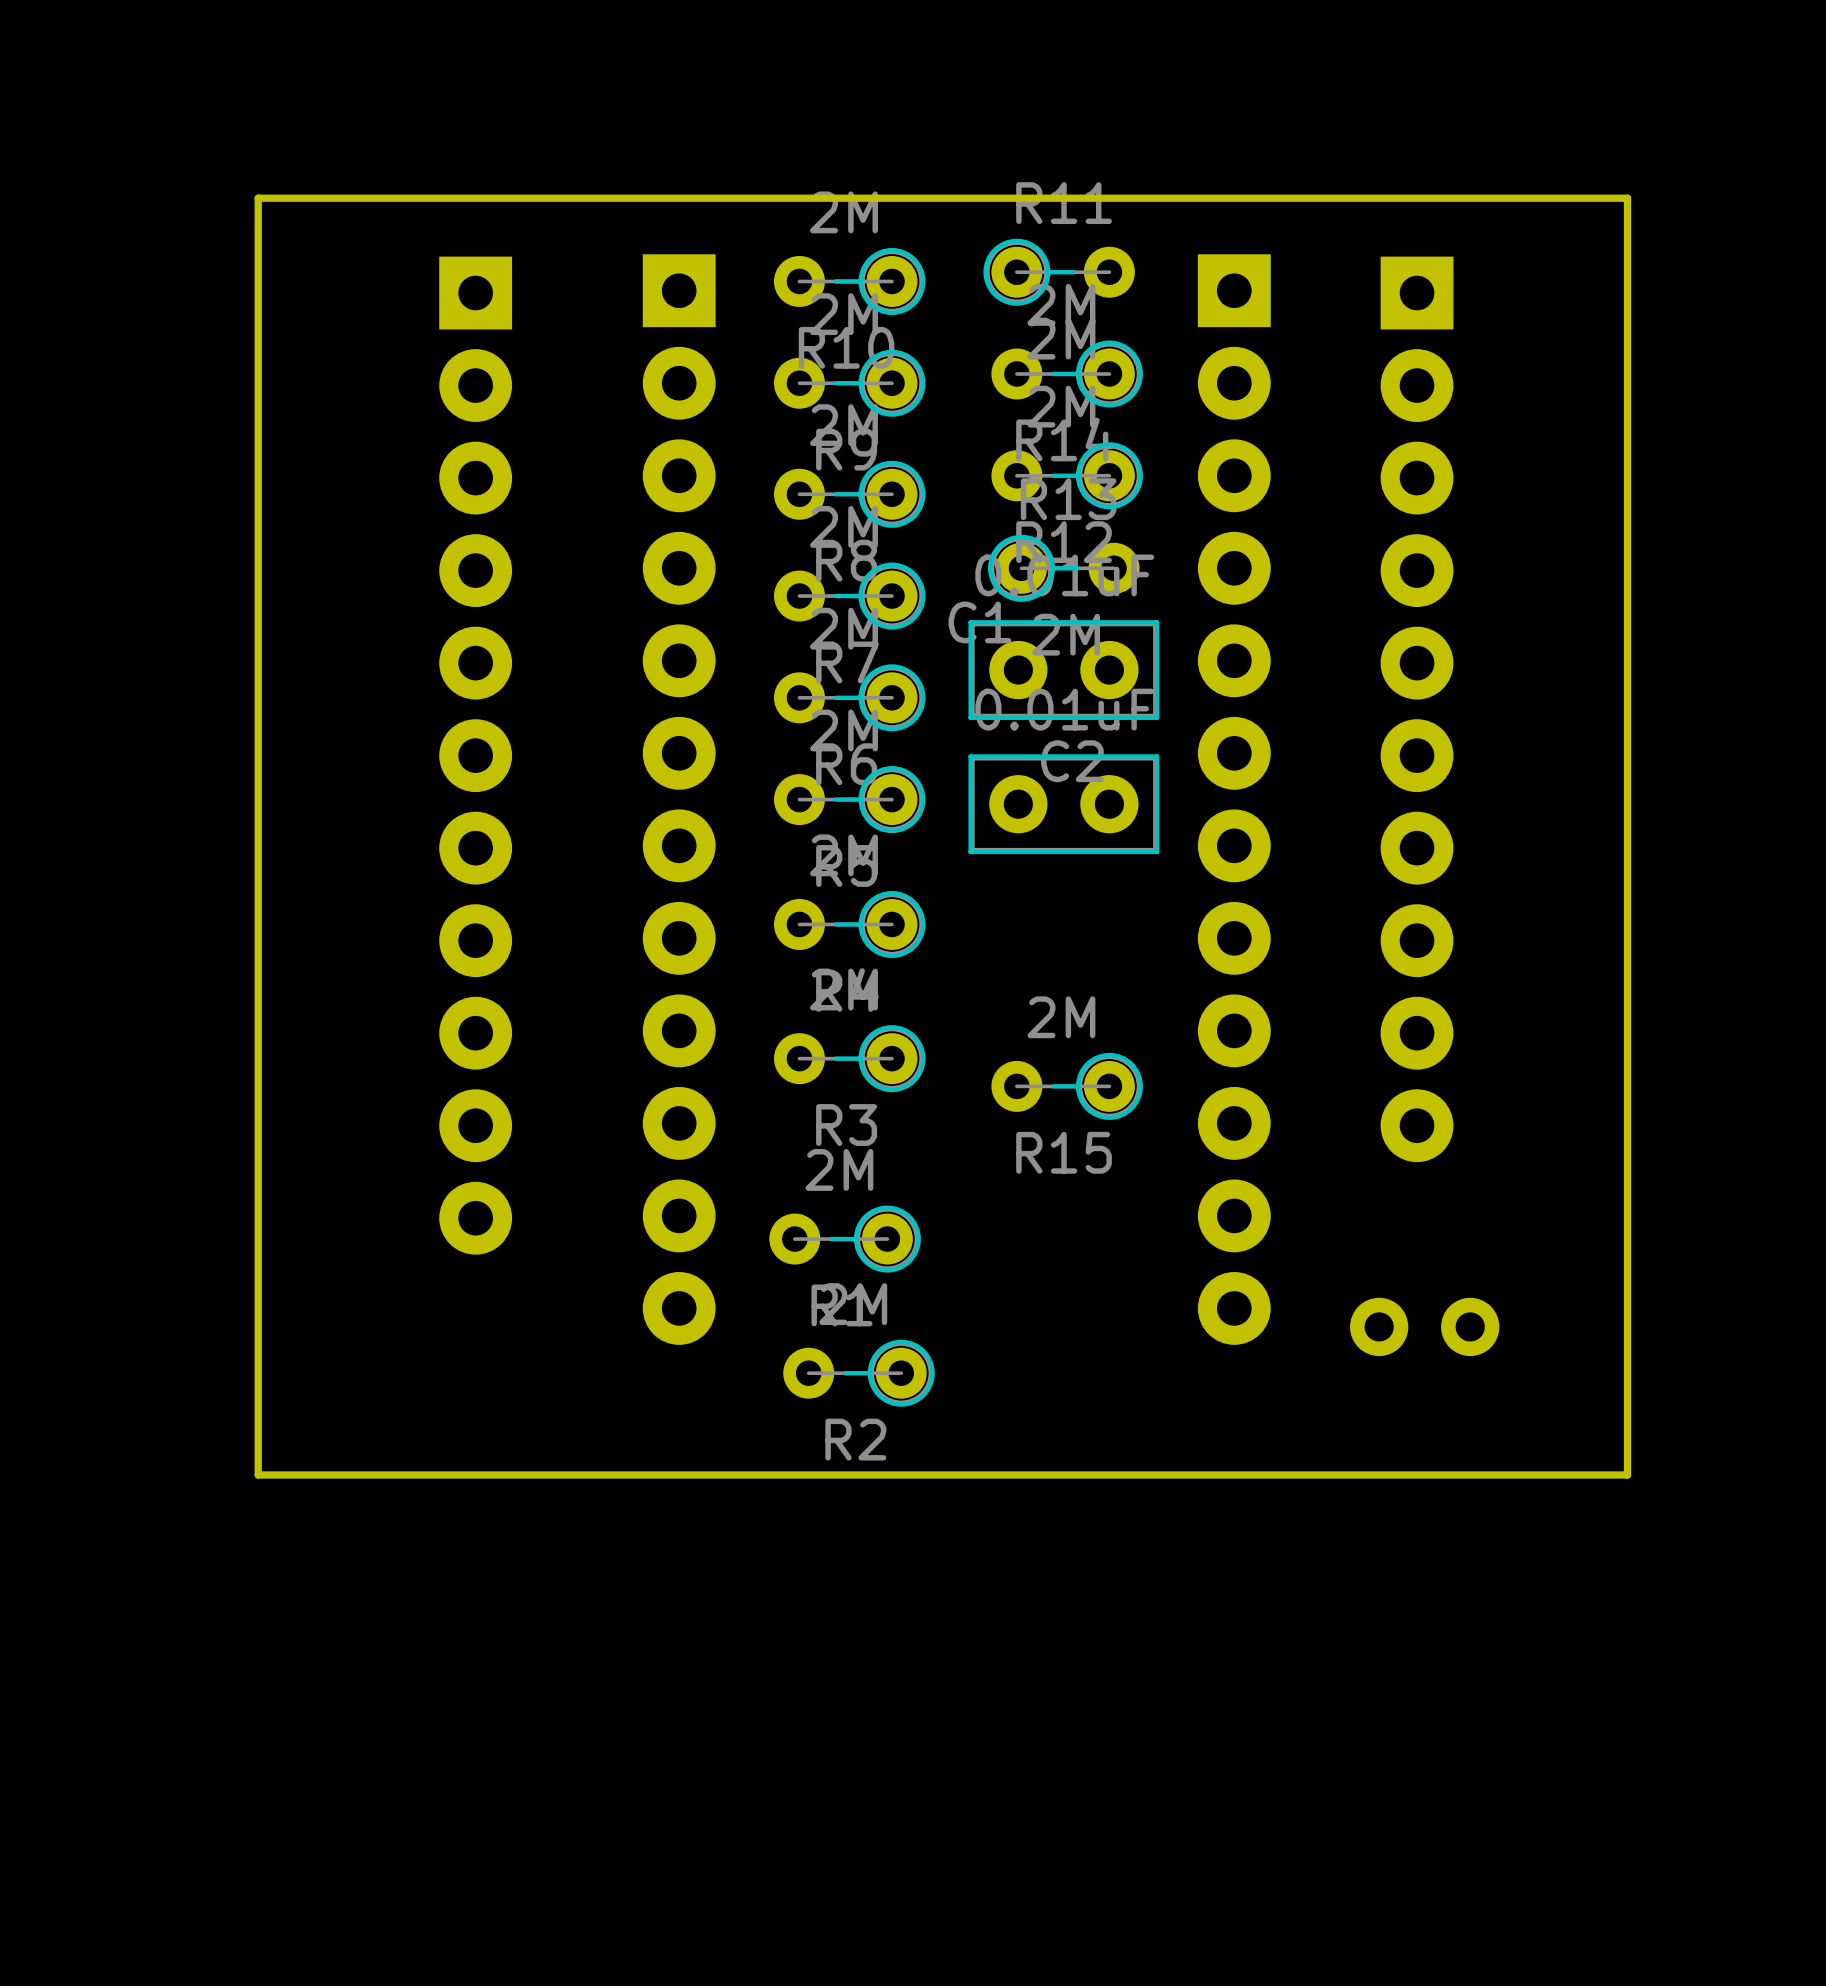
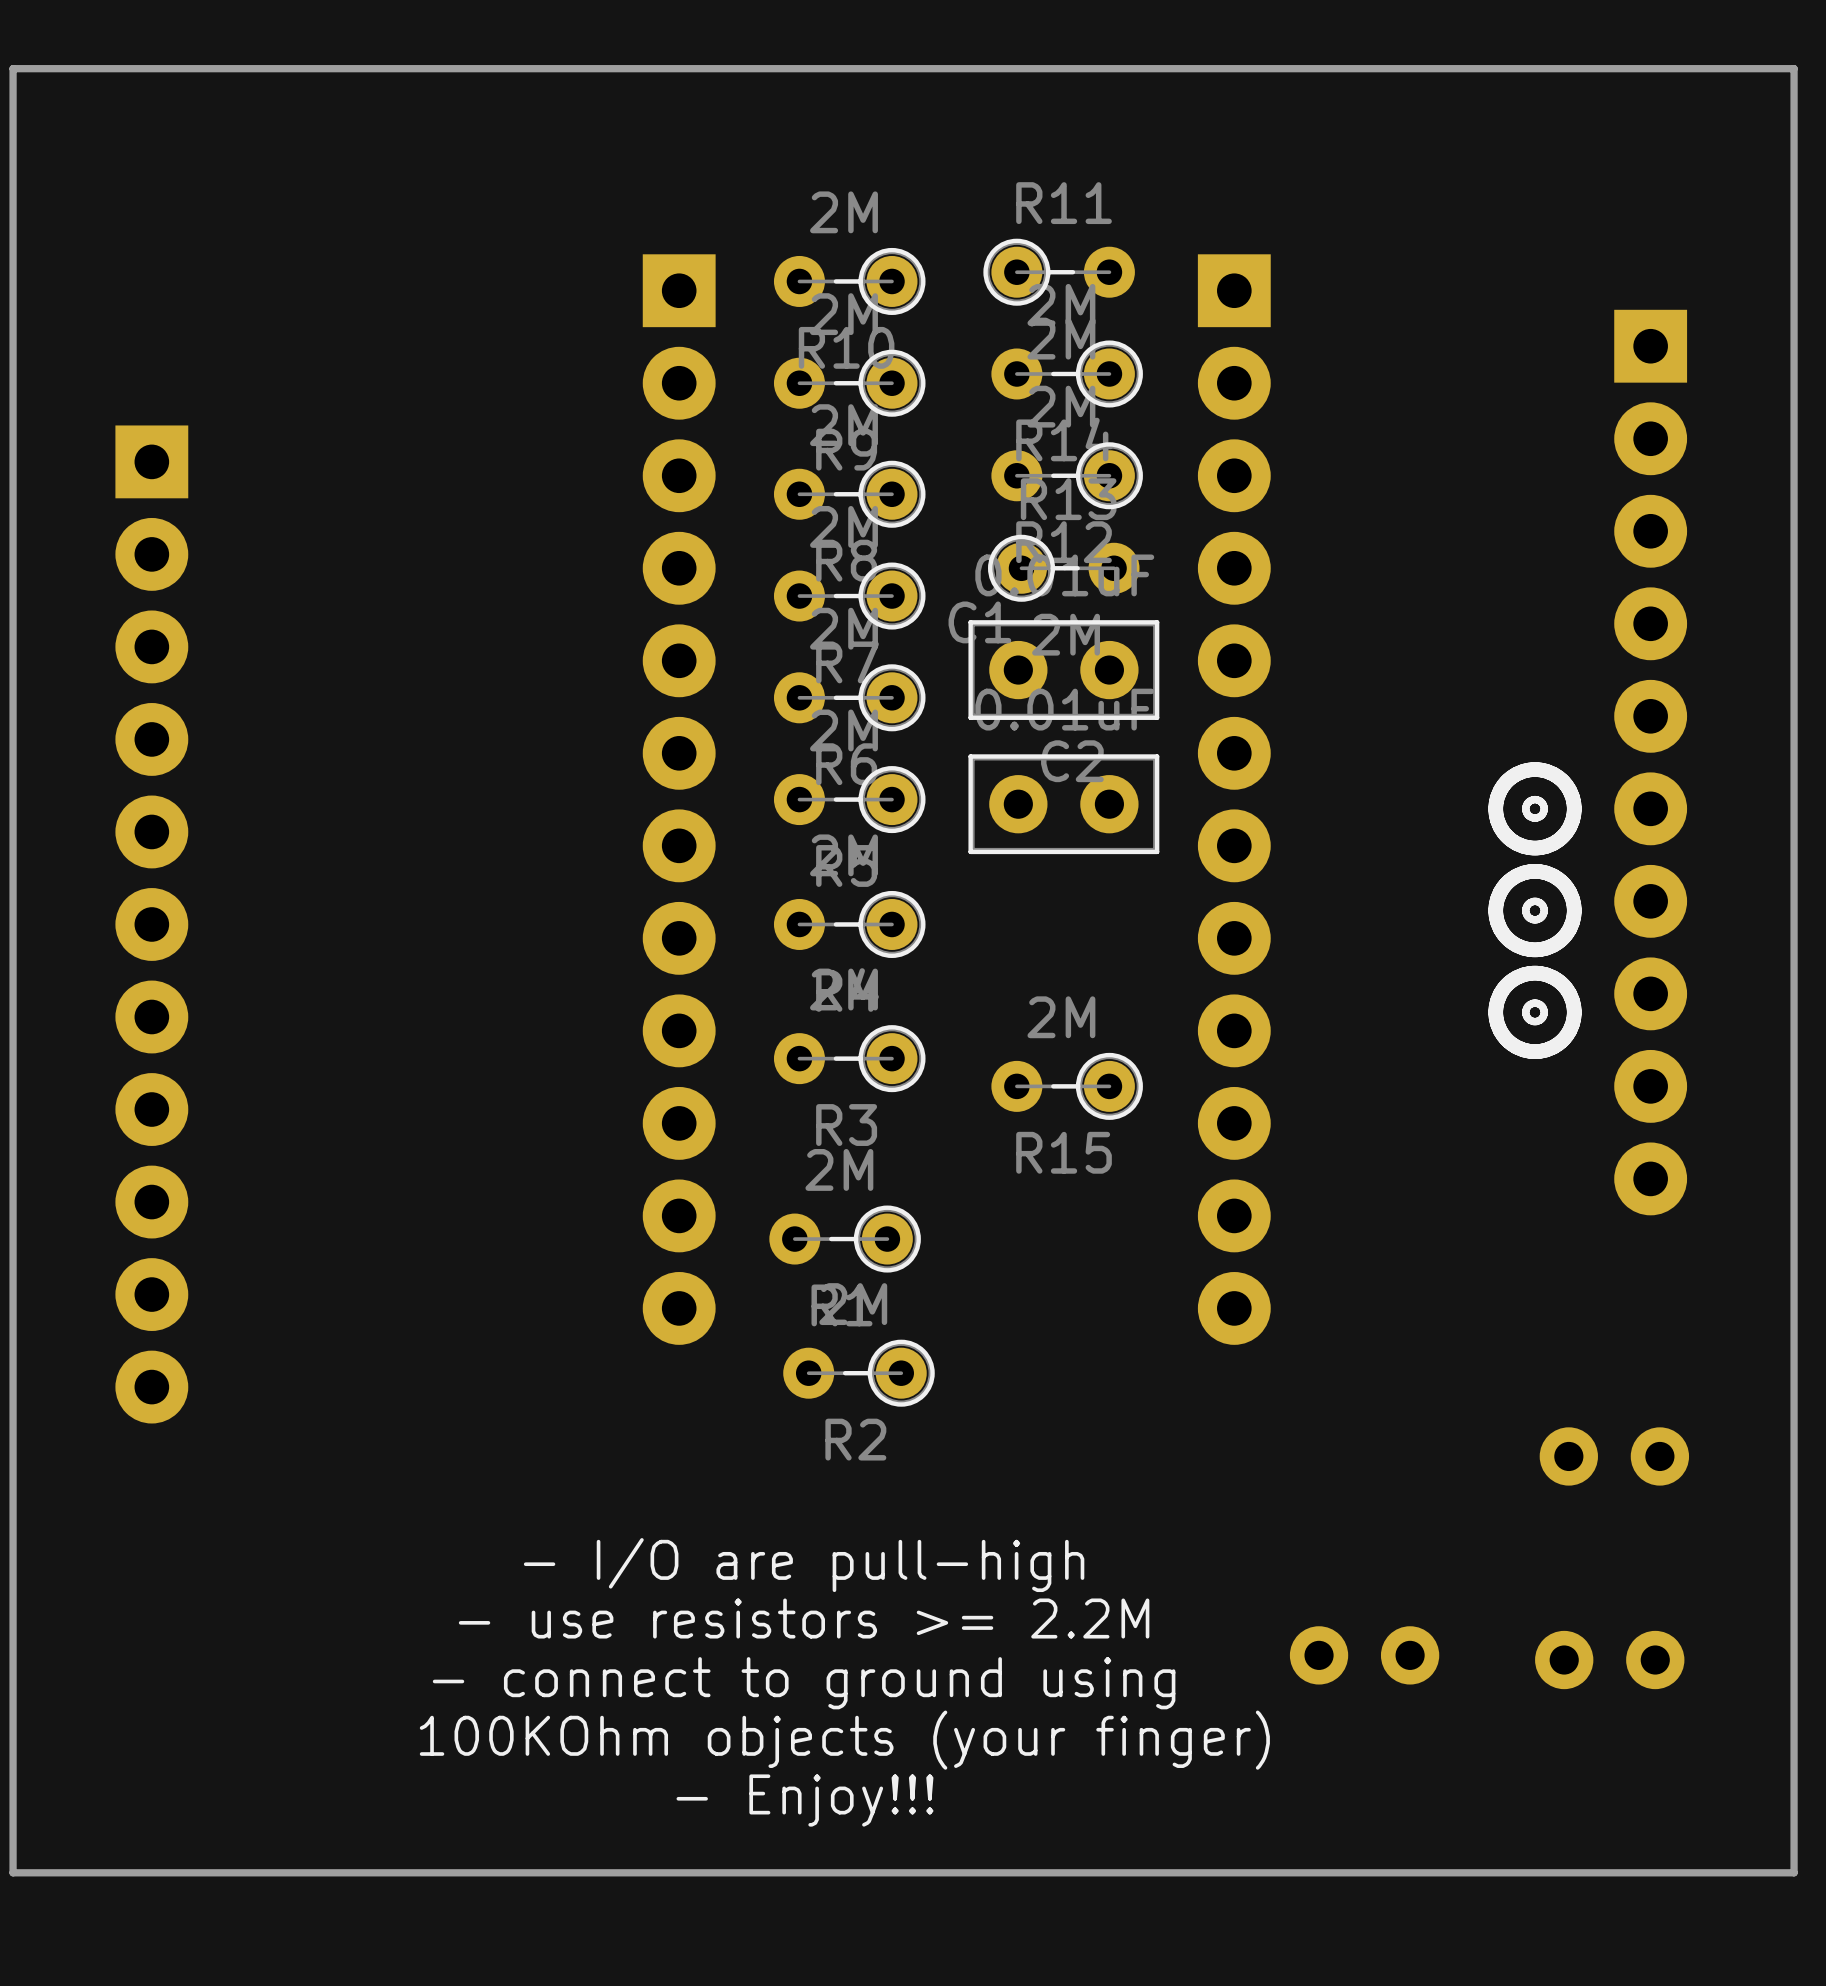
board edge: (1627, 198) (258, 198) (258, 1474) (1627, 1474) (1627, 198) -> (1794, 68) (1794, 1872) (13, 1872) (13, 68) (1794, 68)
part position: (1417, 709) -> (1650, 762)
part position: (475, 755) -> (151, 924)
drawing: none -> [1488, 762, 1582, 1059]
part: (1424, 1326) -> none
part: none -> (1614, 1456)
text: none -> - I/O are pull-high (804, 1565)
text: none -> - use resistors >= 2.2M (804, 1618)
part: none -> (1364, 1655)
part: none -> (1609, 1660)
text: none -> - connect to ground using (804, 1683)
text: none -> 100KOhm objects (your finger) (844, 1740)
text: none -> - Enjoy!!! (804, 1800)

